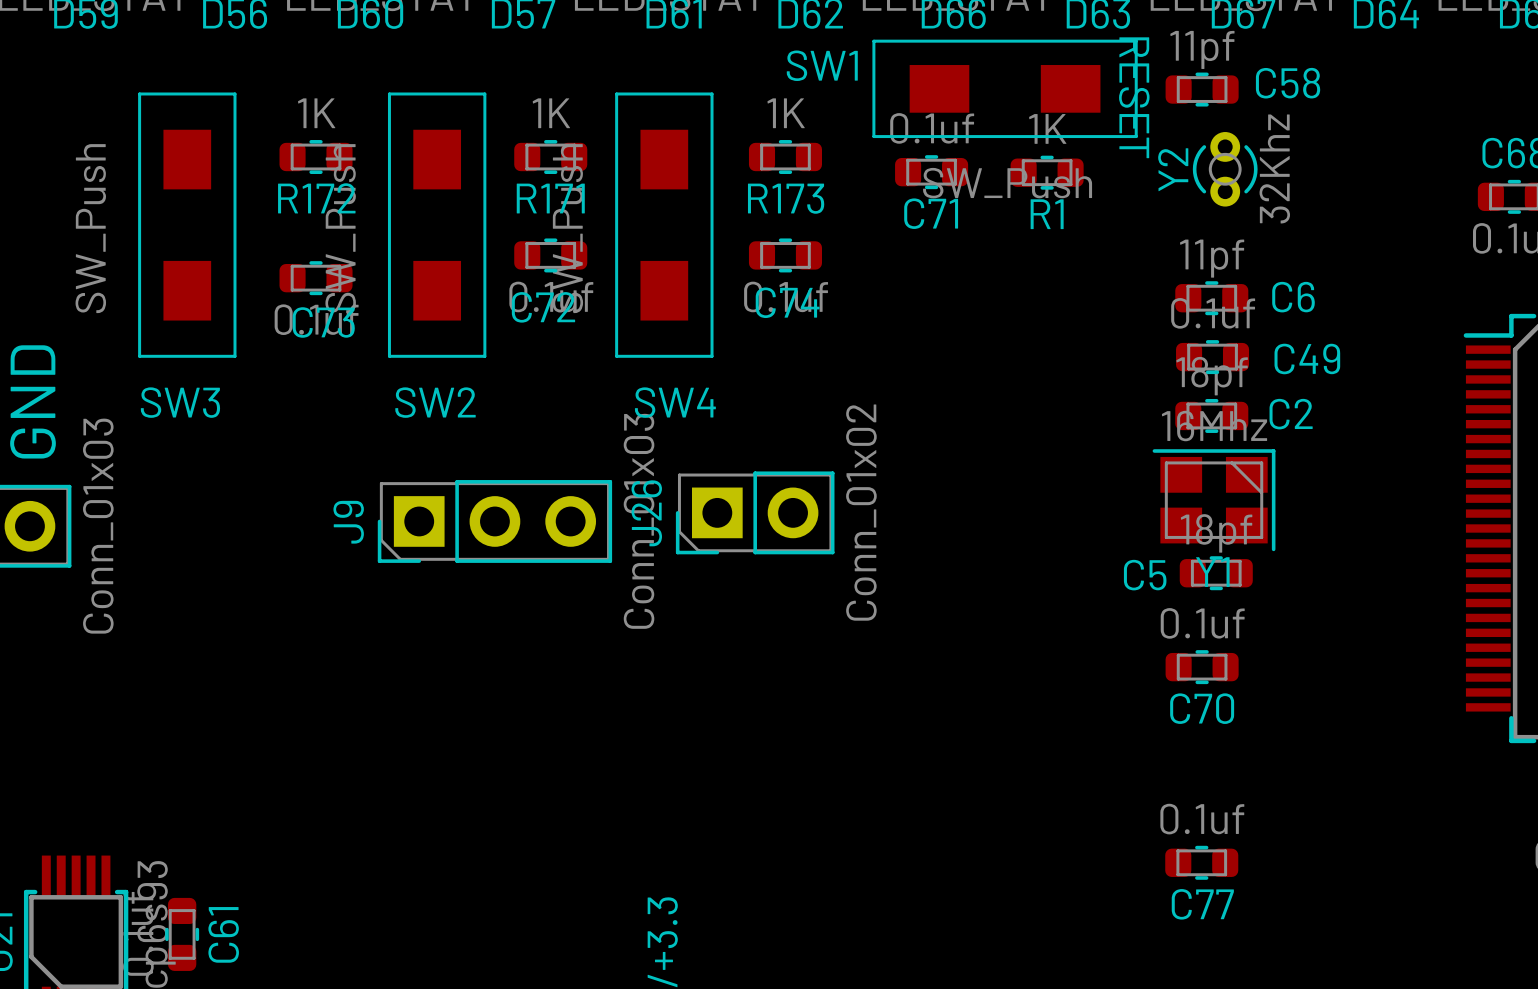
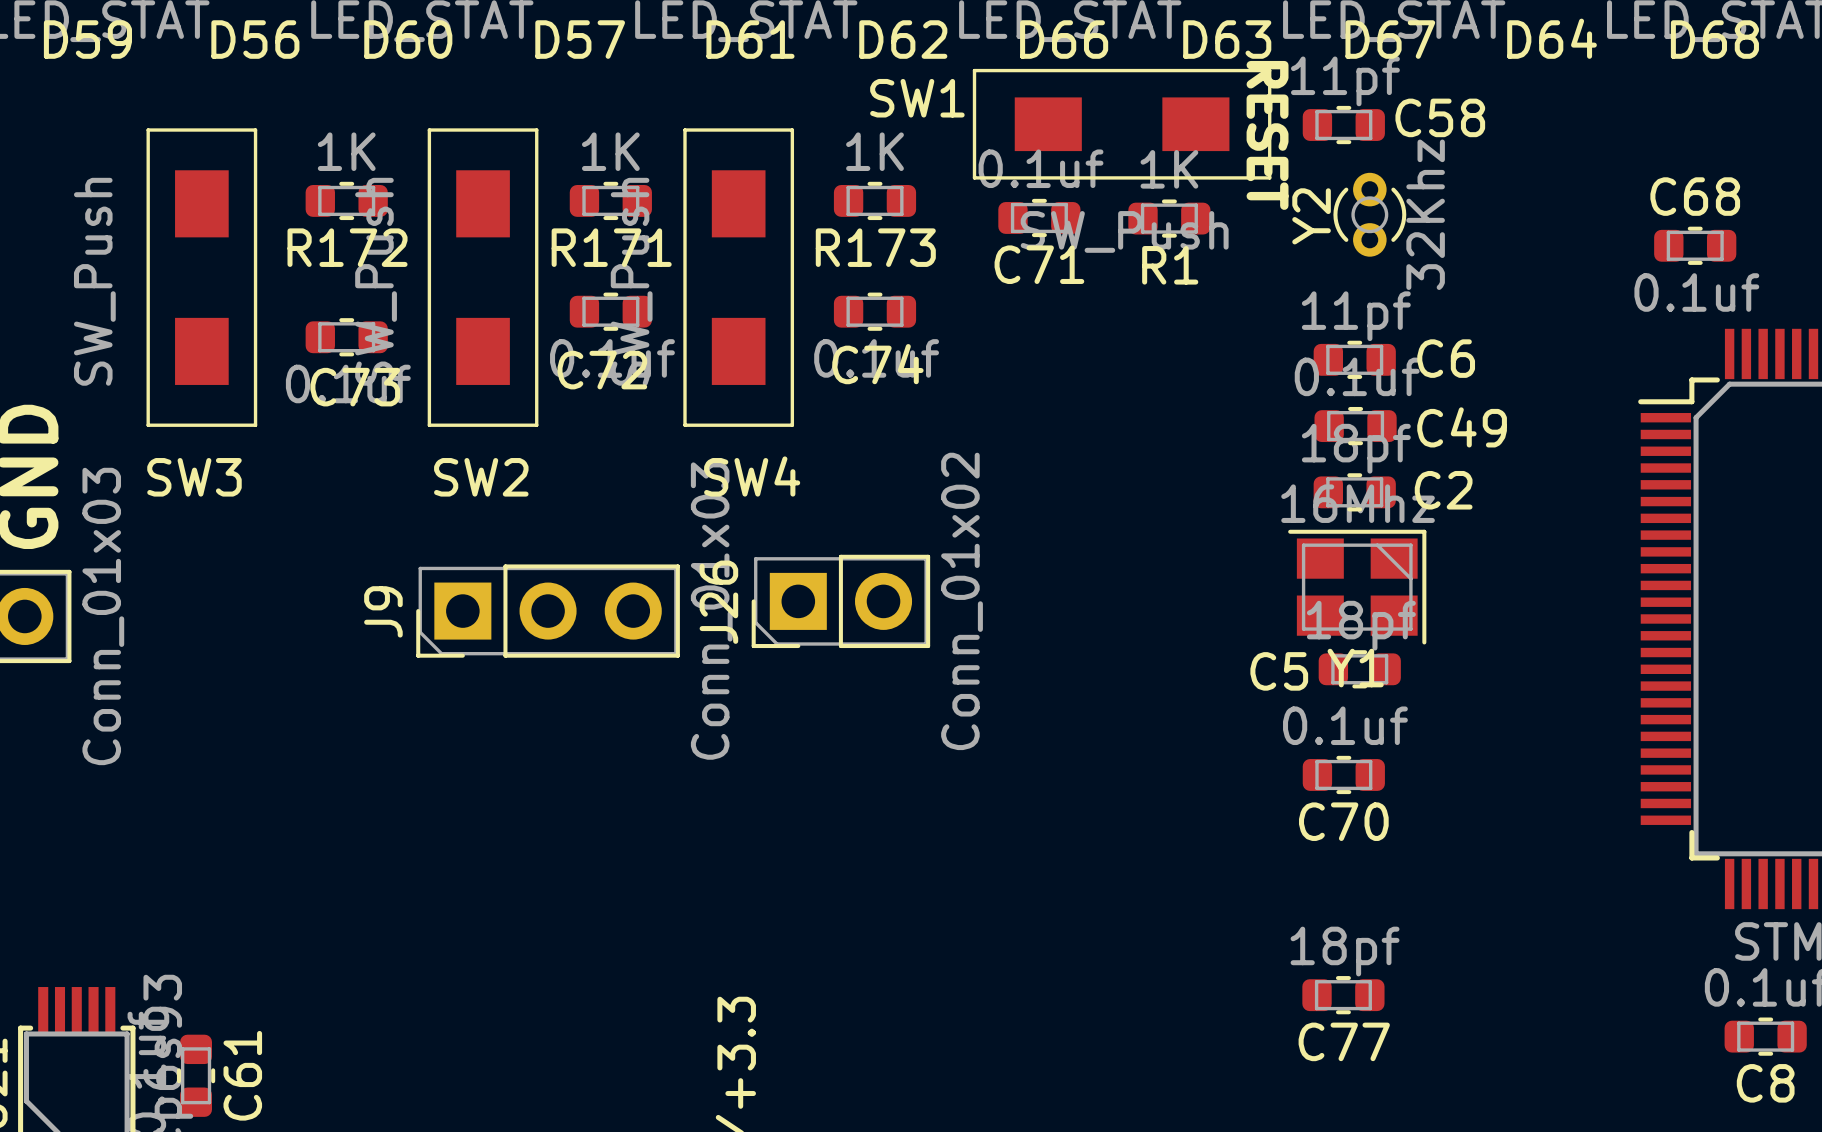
C77 value: 0.1uf (1202, 819) -> 18pf (1345, 951)

